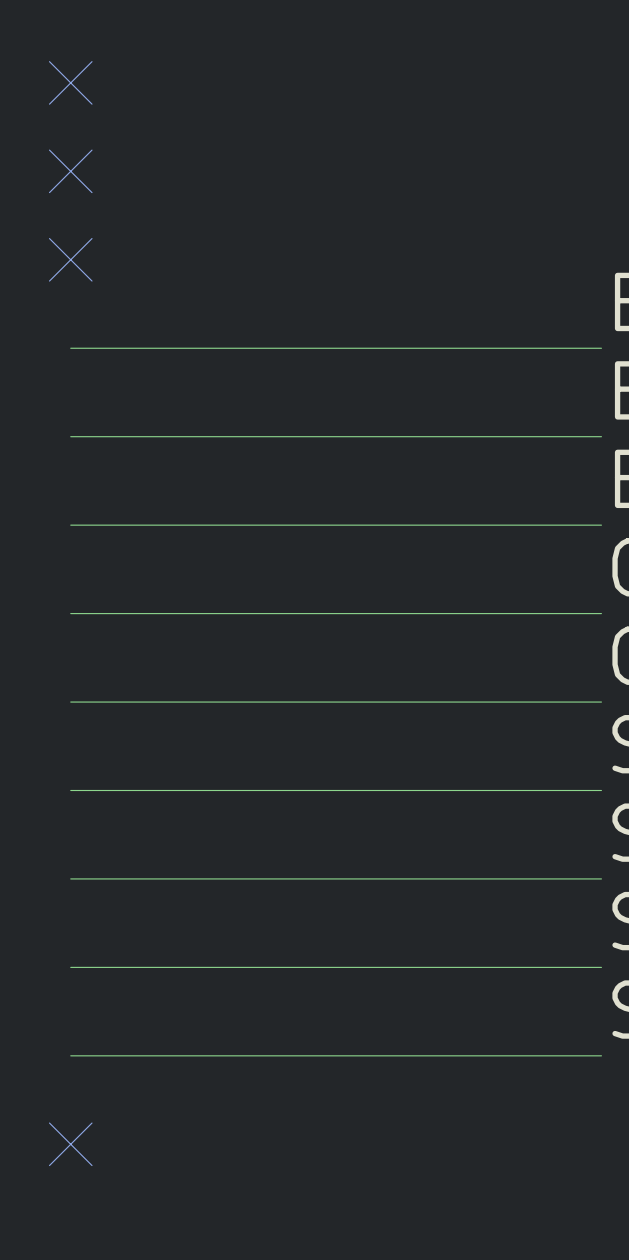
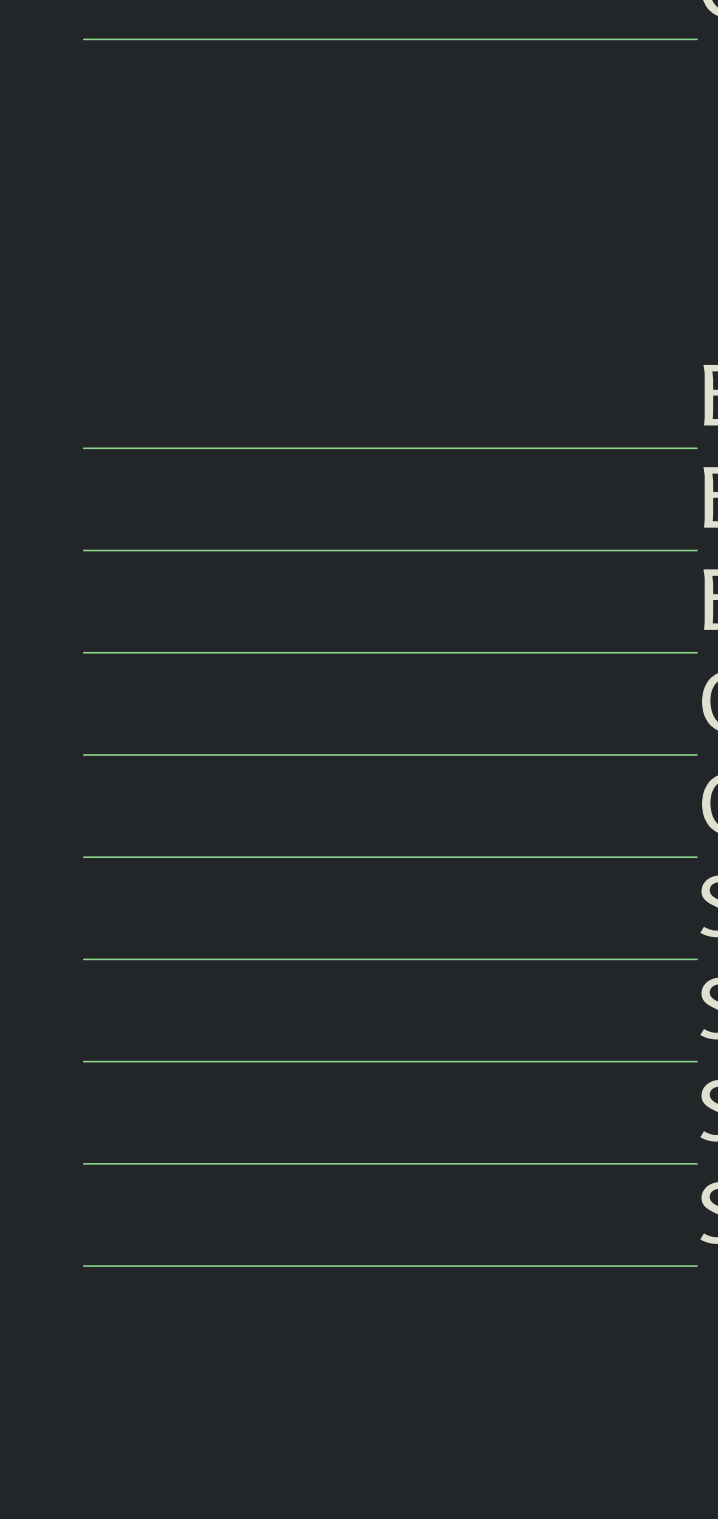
no-connect mark: (70, 82) -> none
no-connect mark: (70, 171) -> none
no-connect mark: (70, 259) -> none
no-connect mark: (70, 1144) -> none

